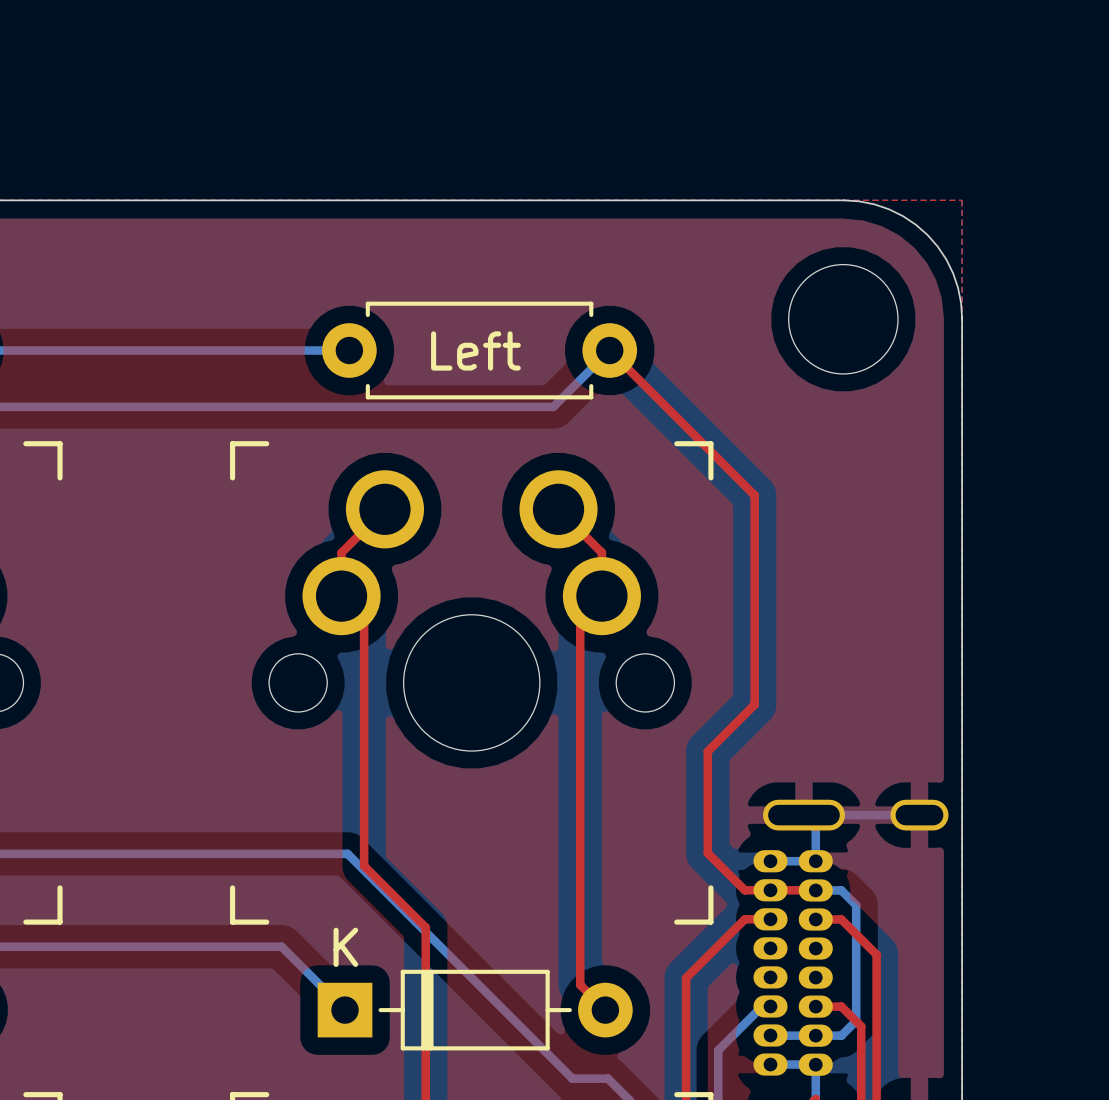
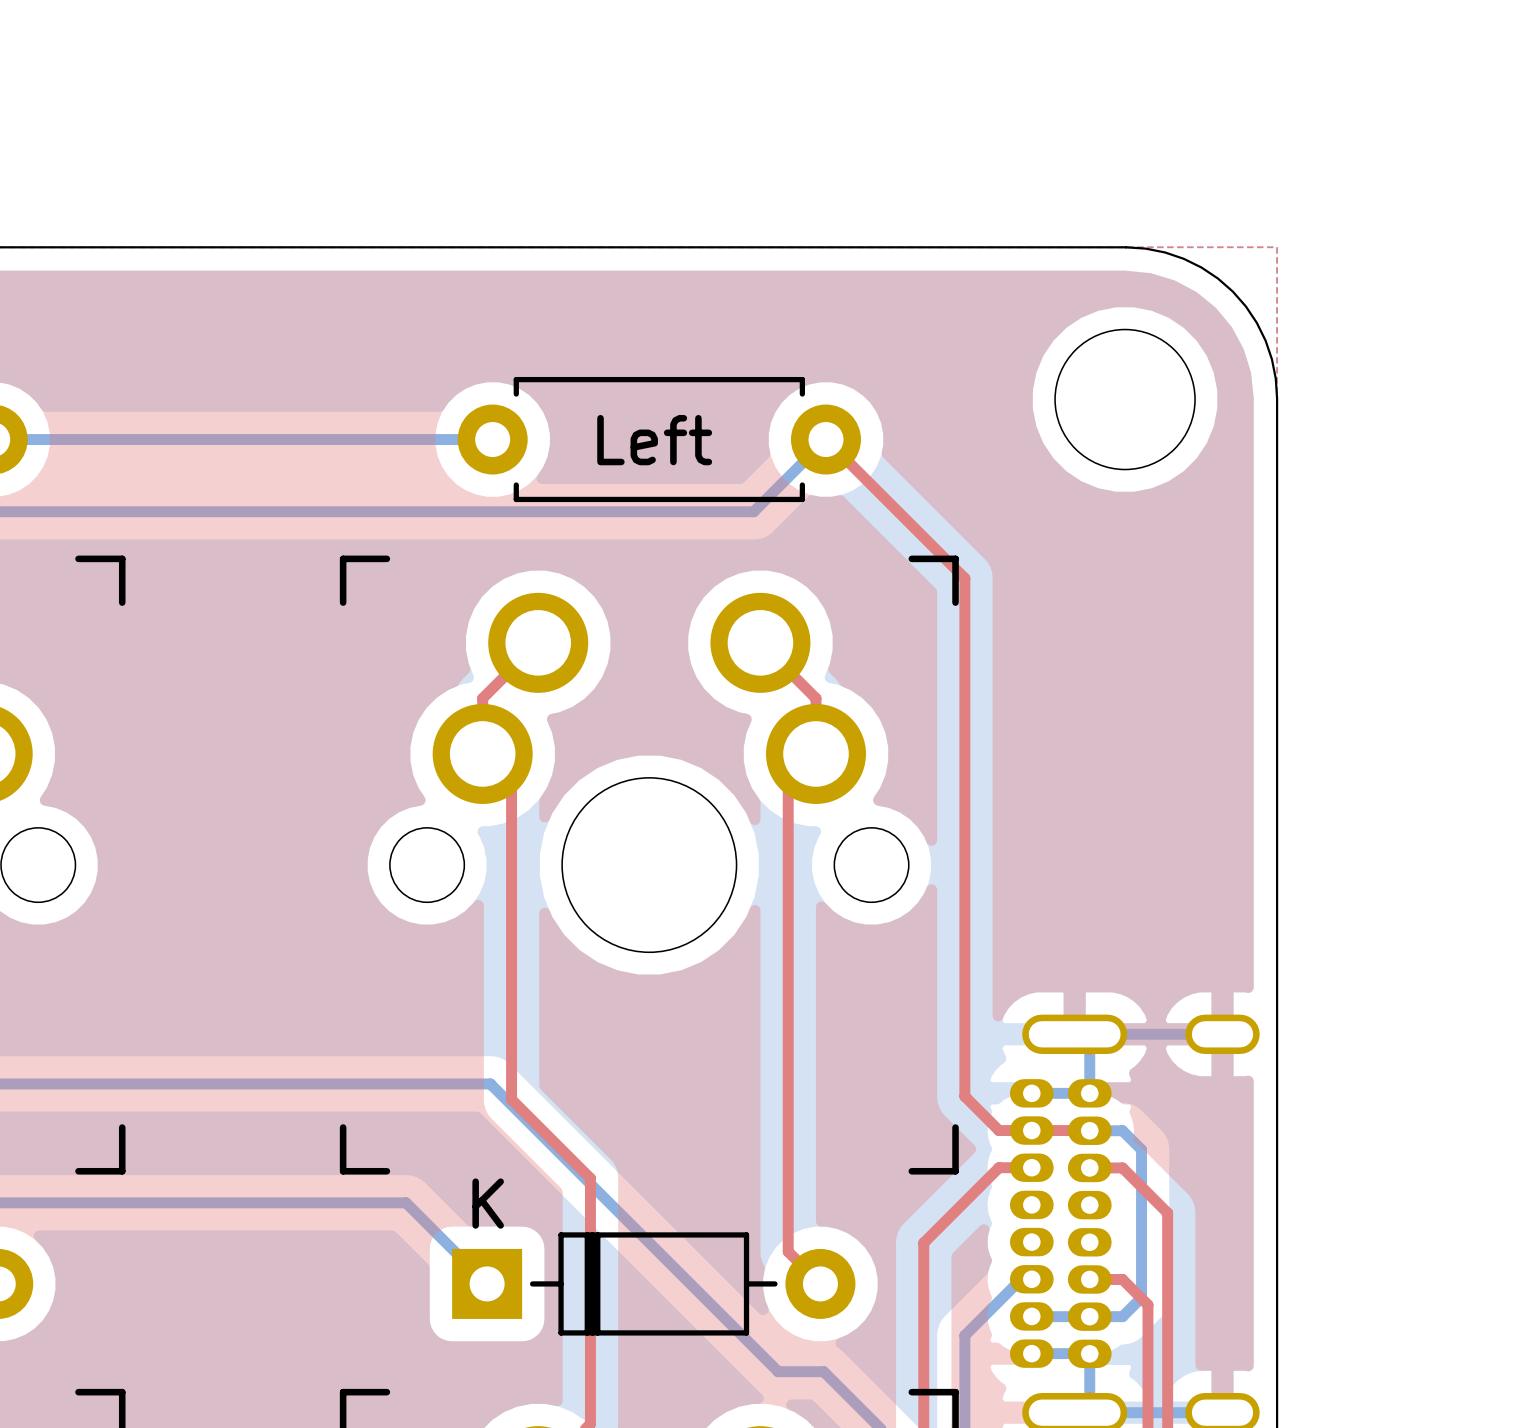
top track: (718, 458) (754, 495) (754, 704) (707, 751) (707, 853) (718, 863) -> (964, 578) (964, 1096)

